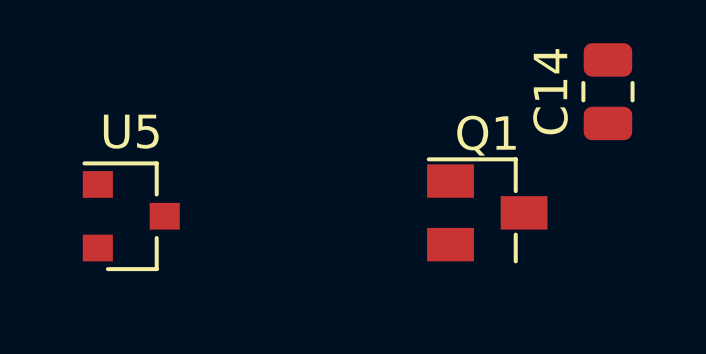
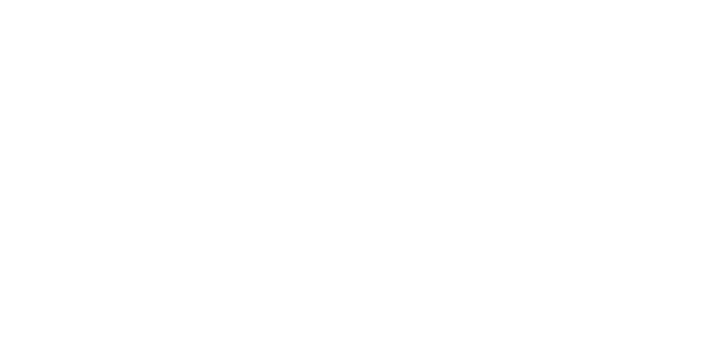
C14: (607, 91) -> none
Q1: (487, 210) -> none
U5: (131, 216) -> none

